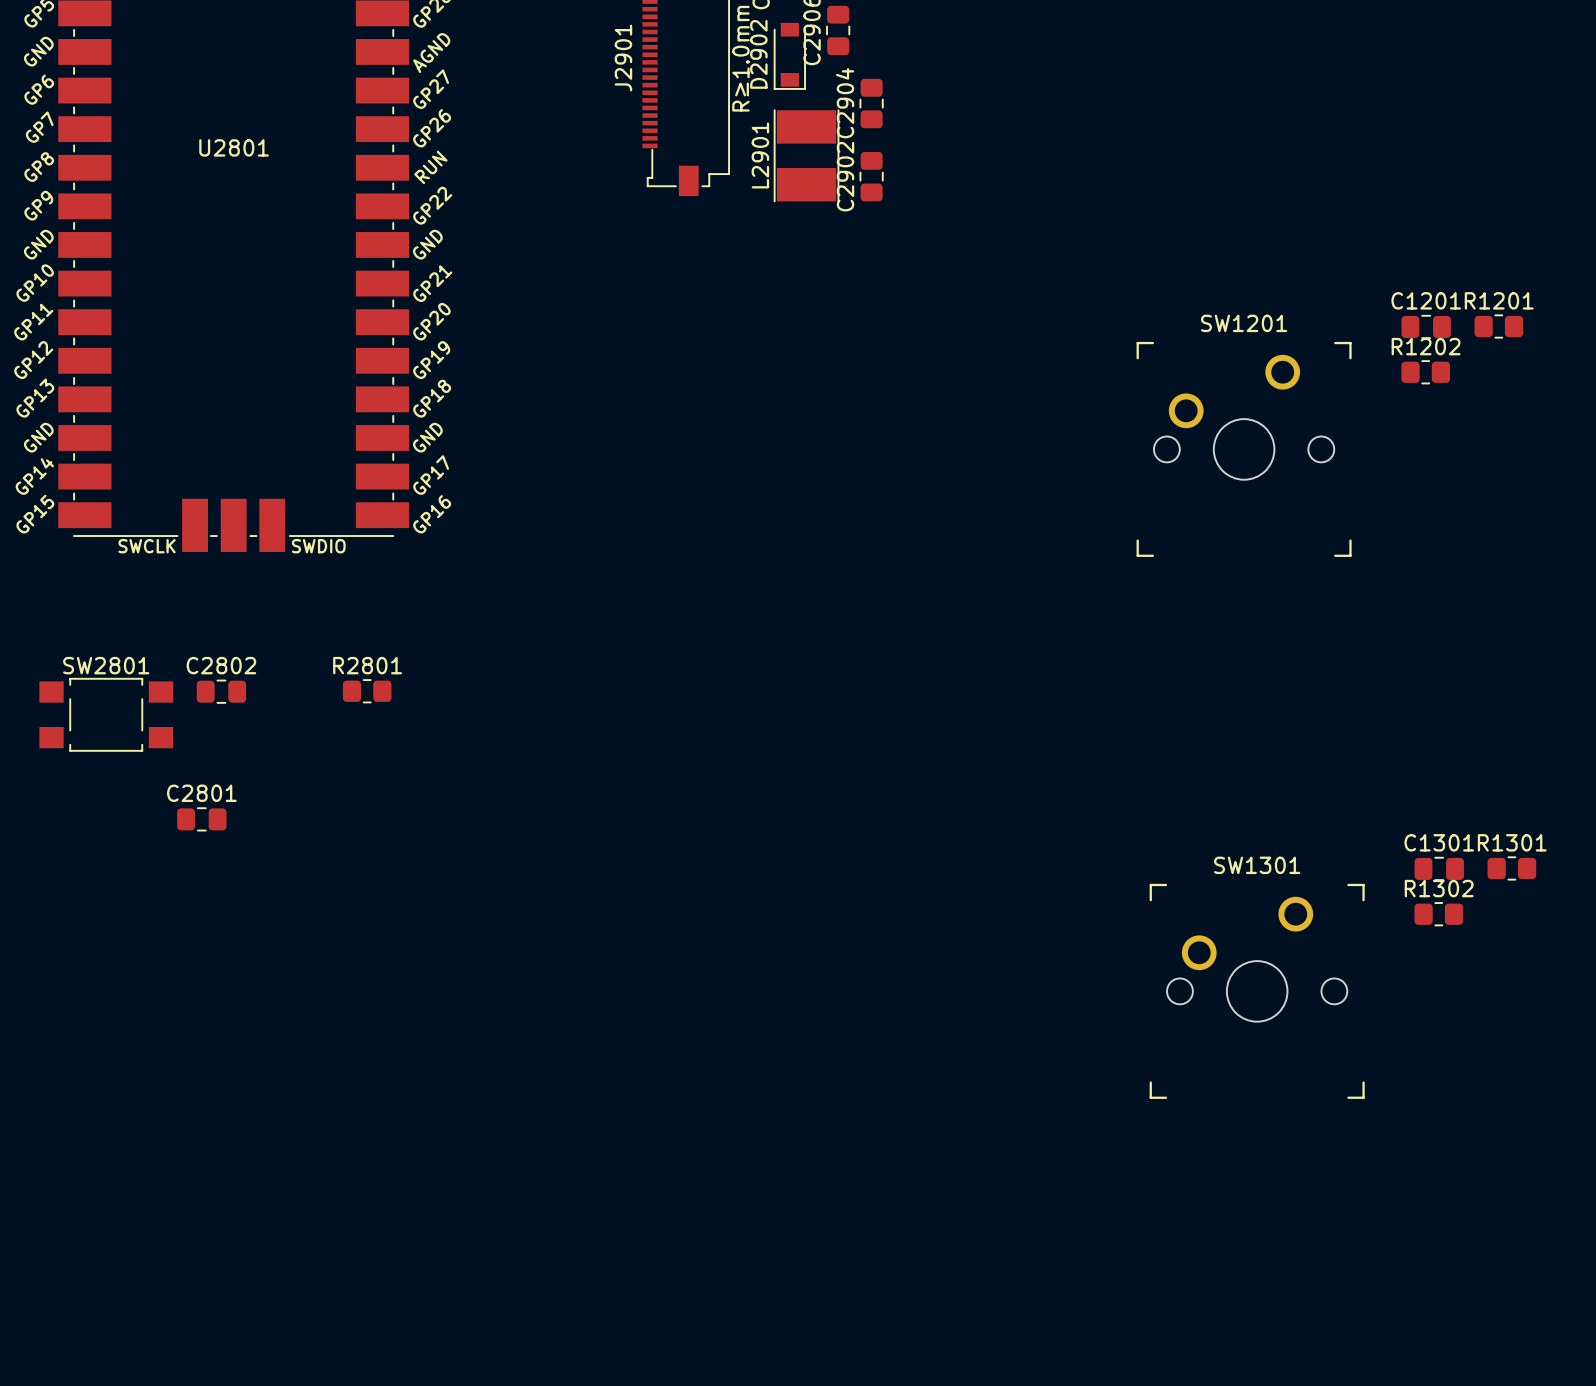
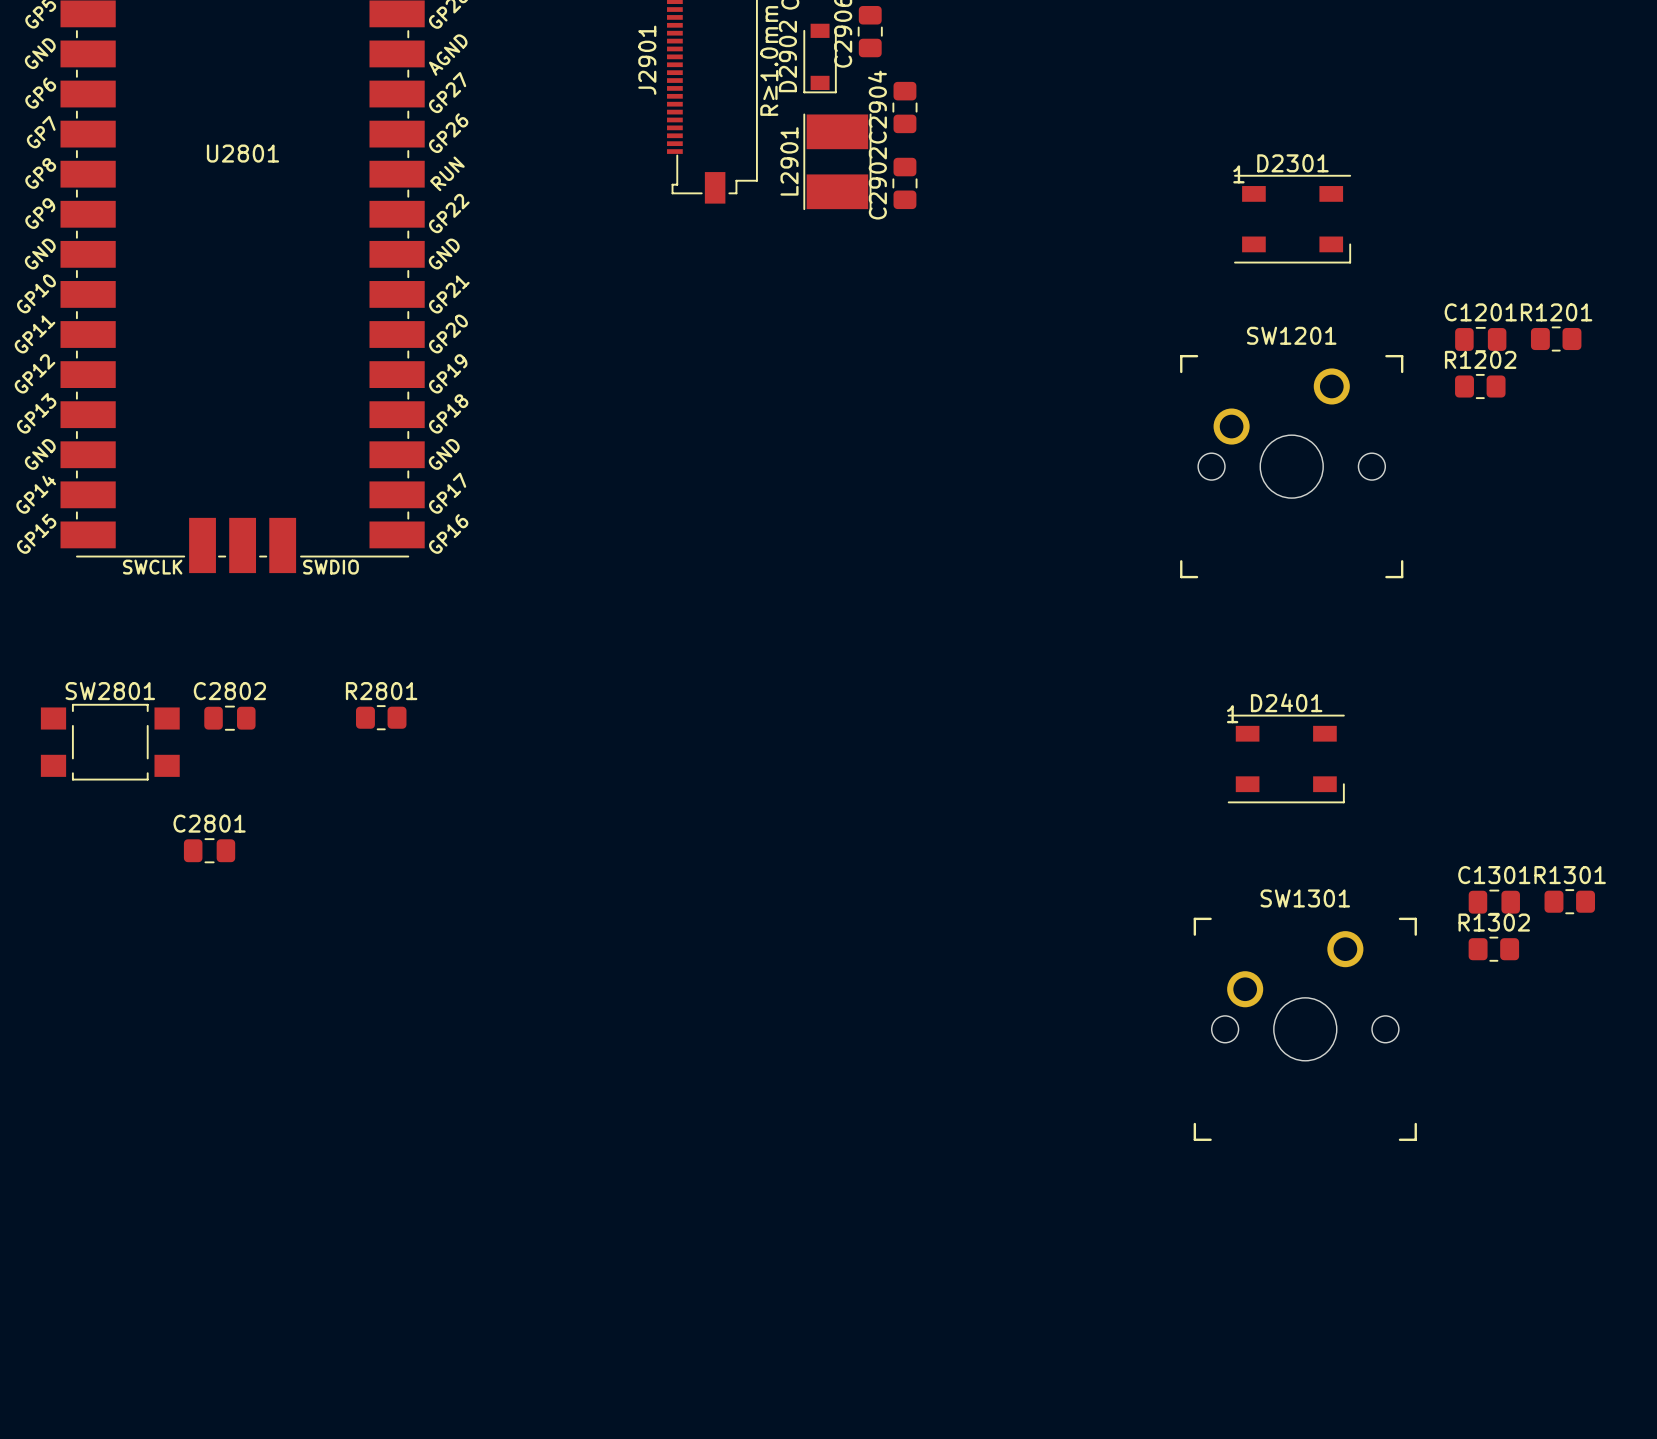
D2301: none -> (1292, 219)
D2401: none -> (1286, 758)

